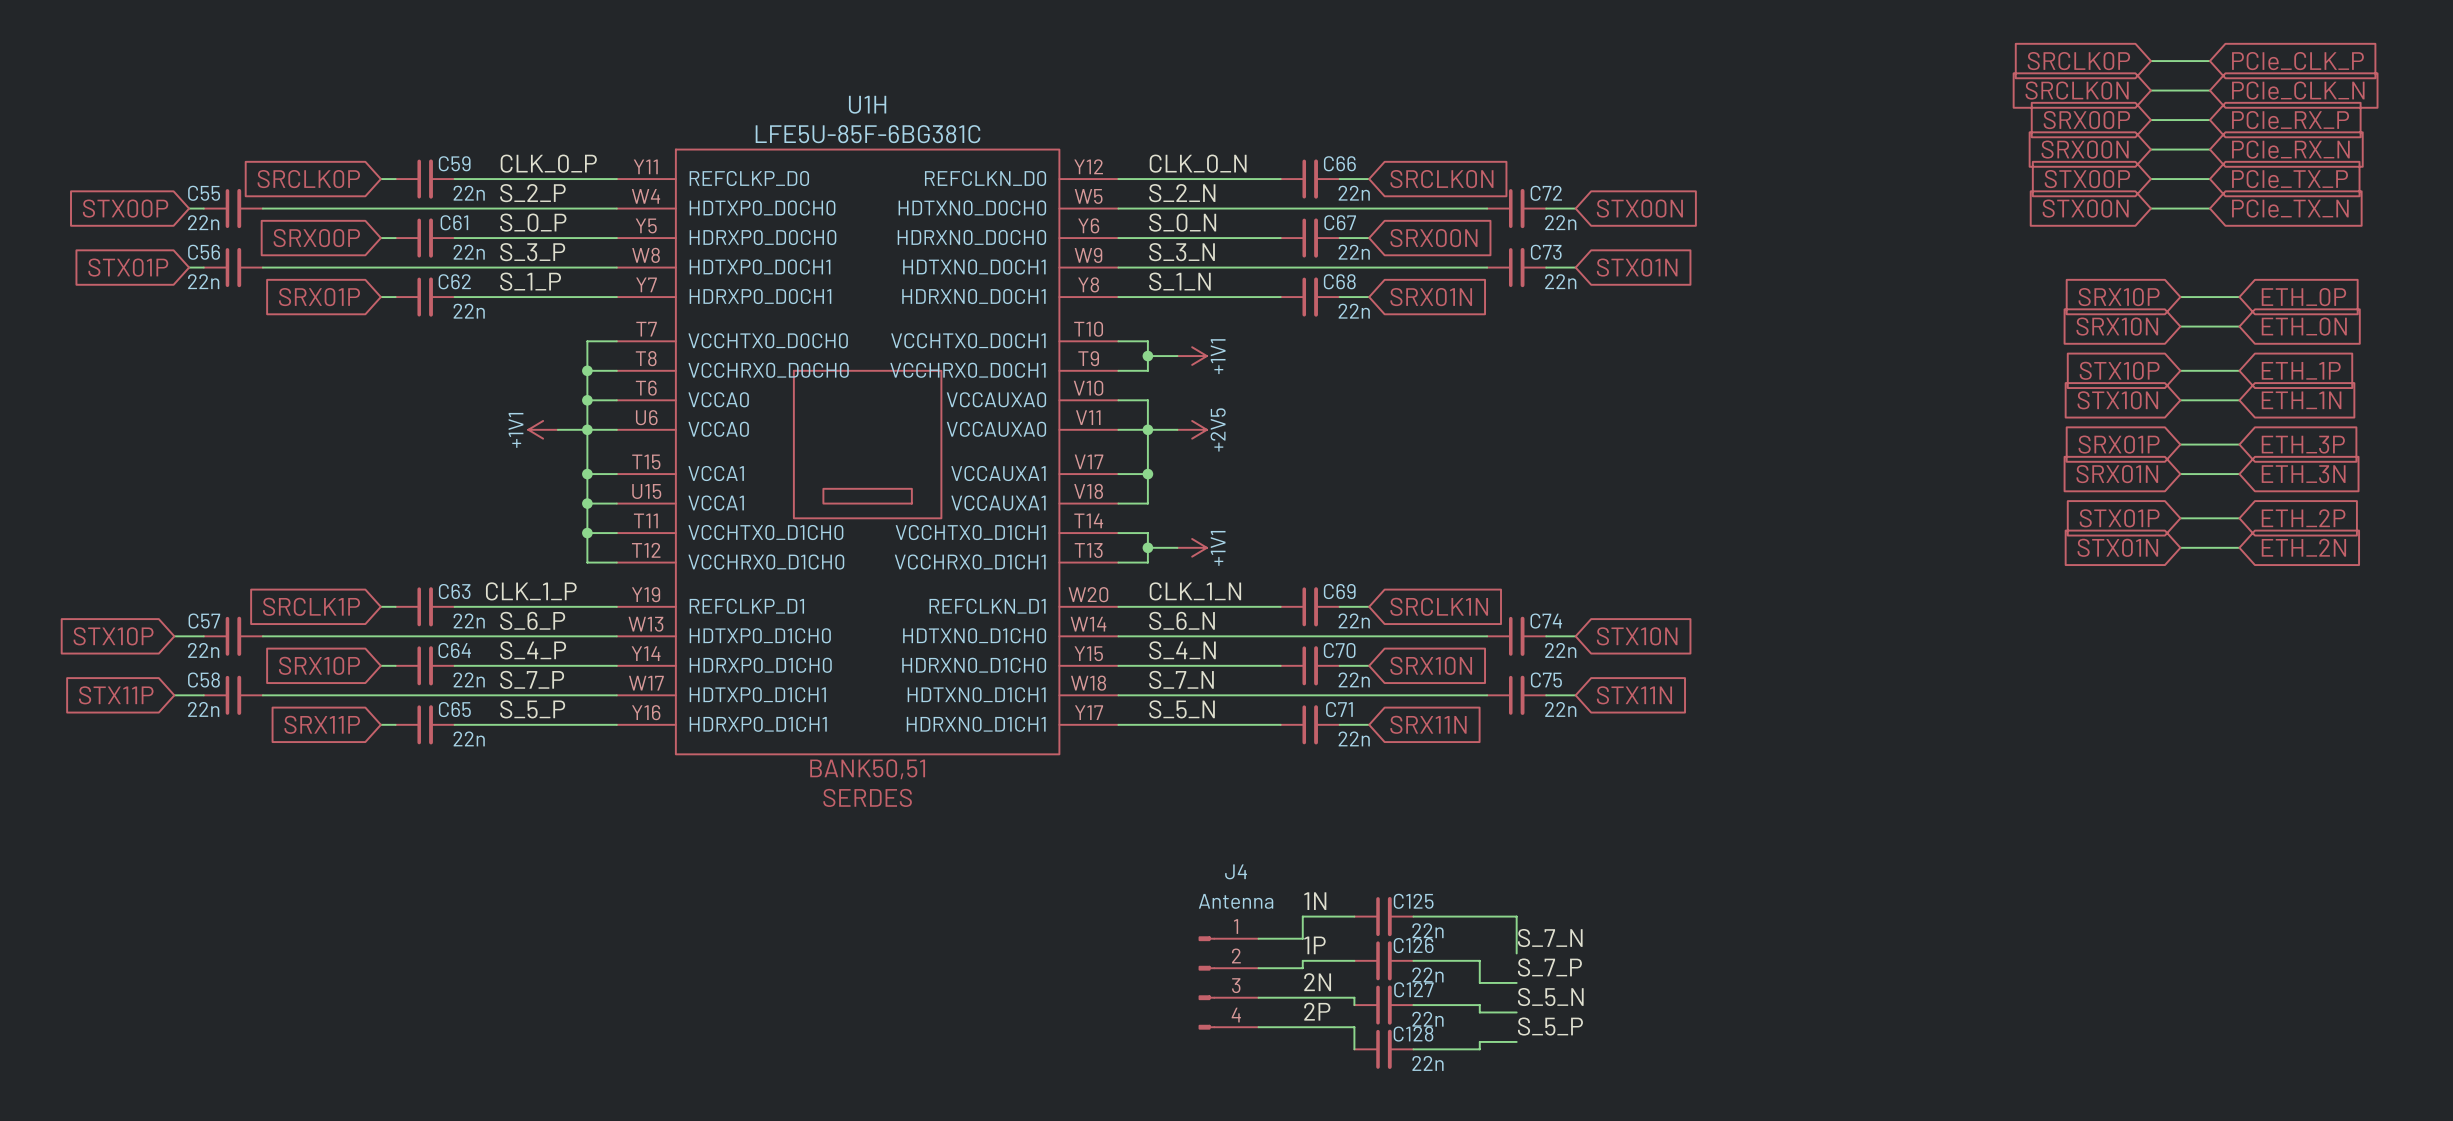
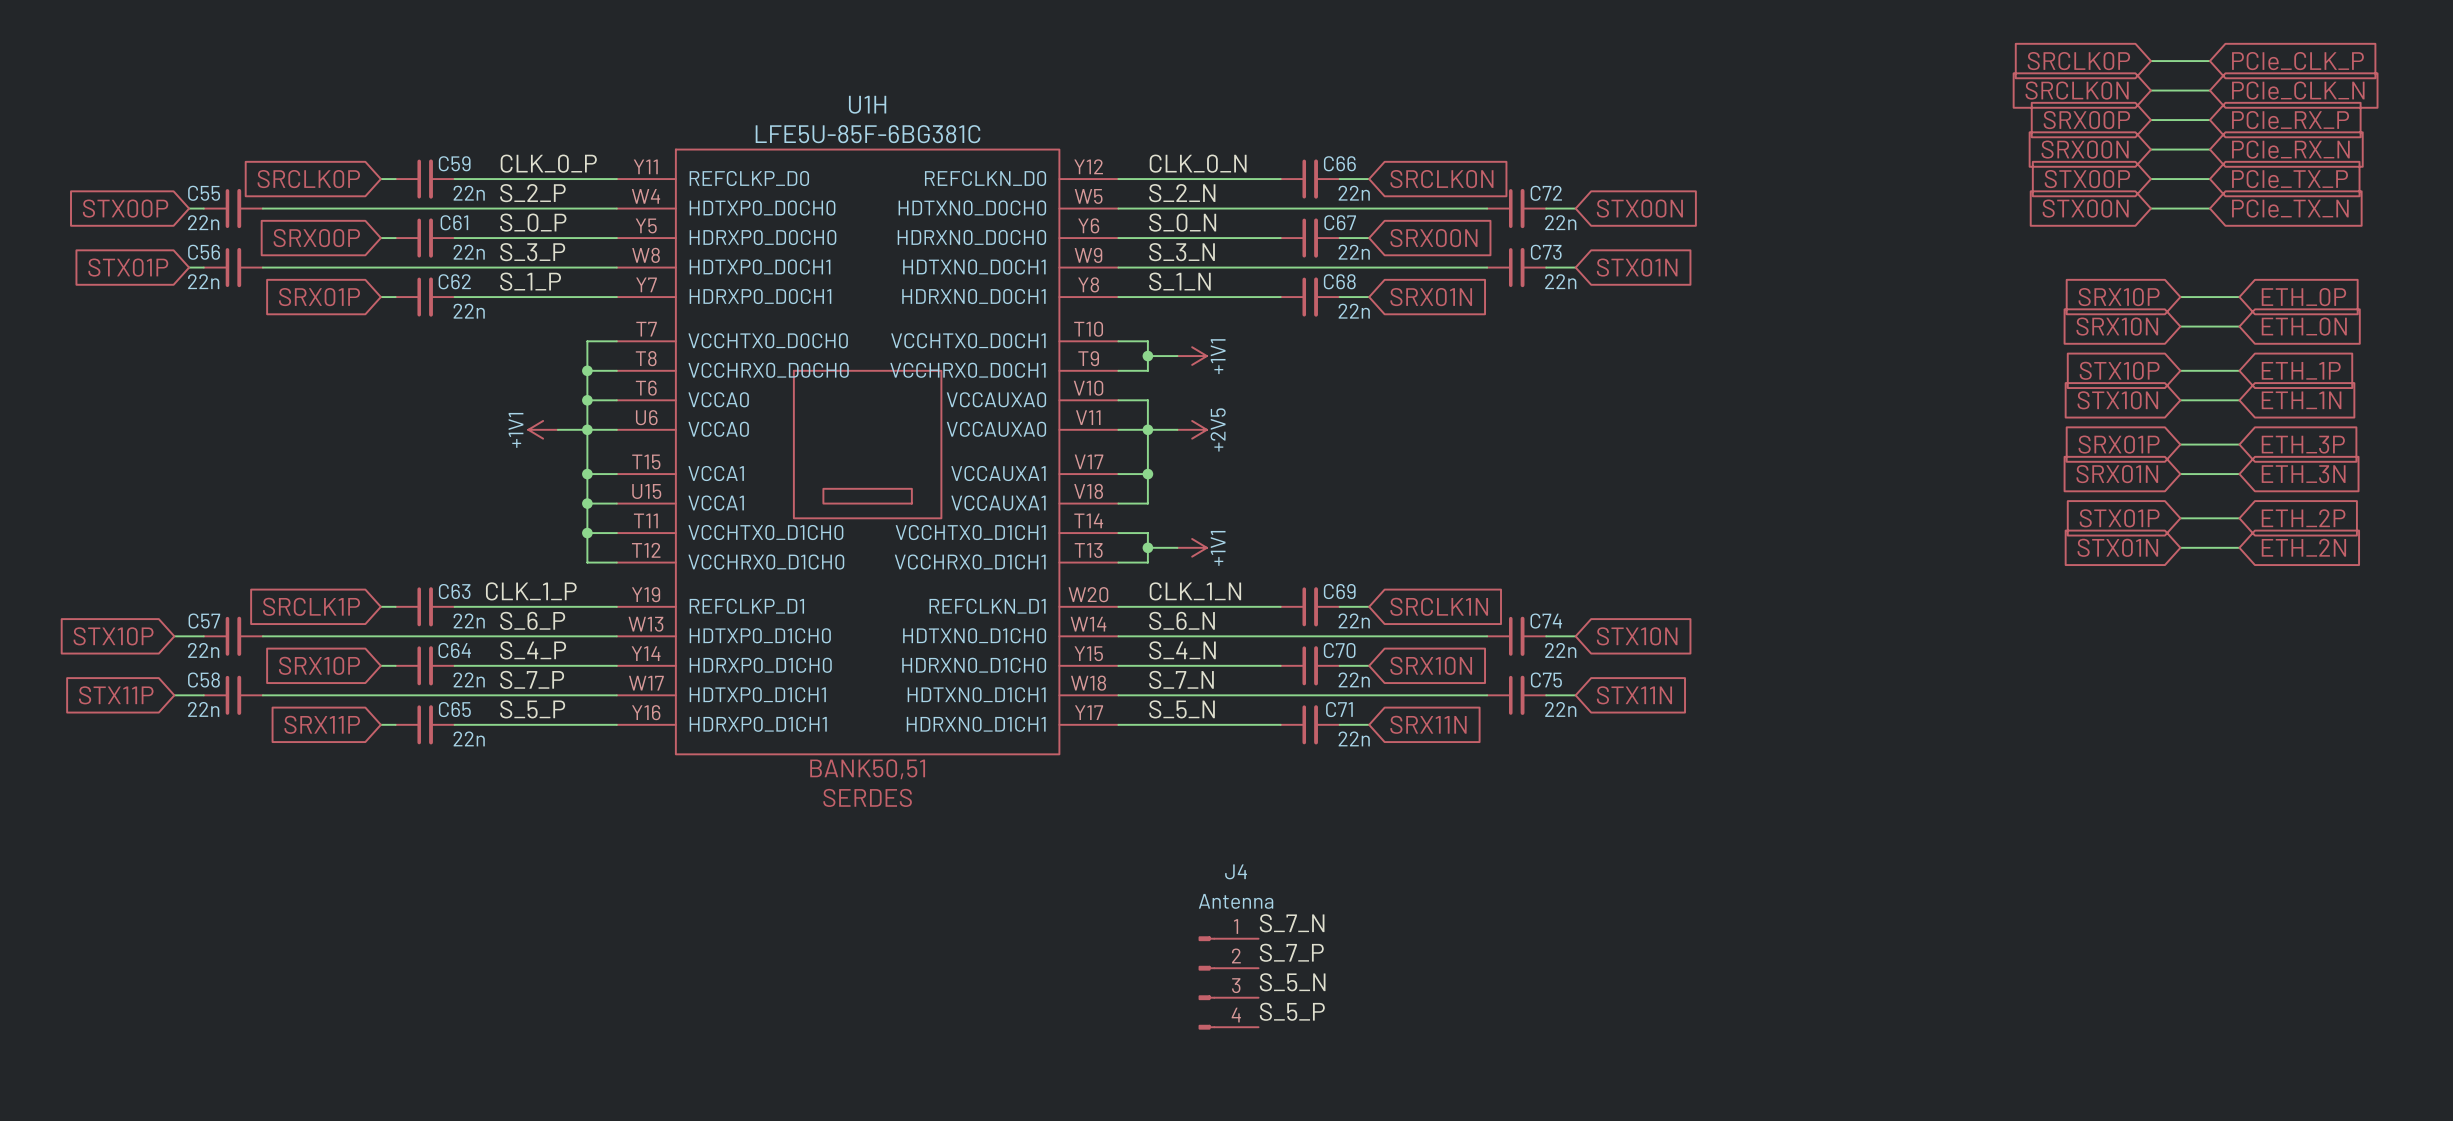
label: 1N (1315, 901) -> none
wire: (1354, 916) (1302, 916) (1302, 938) (1258, 938) -> none
C125: 22n (1383, 916) -> none
wire: (1413, 916) (1516, 916) (1516, 953) -> none
label position: S_7_N (1550, 938) -> S_7_N (1292, 923)
label: 1P (1314, 945) -> none
wire: (1354, 960) (1302, 960) (1302, 968) (1258, 968) -> none
C126: 22n (1383, 960) -> none
wire: (1413, 960) (1479, 960) (1479, 982) (1516, 982) -> none
label position: S_7_P (1549, 967) -> S_7_P (1291, 952)
label: 2N (1317, 982) -> none
wire: (1258, 997) (1354, 997) (1354, 1005) -> none
label position: S_5_N (1550, 997) -> S_5_N (1292, 982)
C127: 22n (1383, 1005) -> none
wire: (1413, 1005) (1479, 1005) (1479, 1012) (1516, 1012) -> none
label: 2P (1317, 1011) -> none
label position: S_5_P (1550, 1026) -> S_5_P (1292, 1011)
wire: (1258, 1027) (1354, 1027) (1354, 1049) -> none
wire: (1516, 1041) (1479, 1041) (1479, 1049) (1413, 1049) -> none
C128: 22n (1383, 1049) -> none

